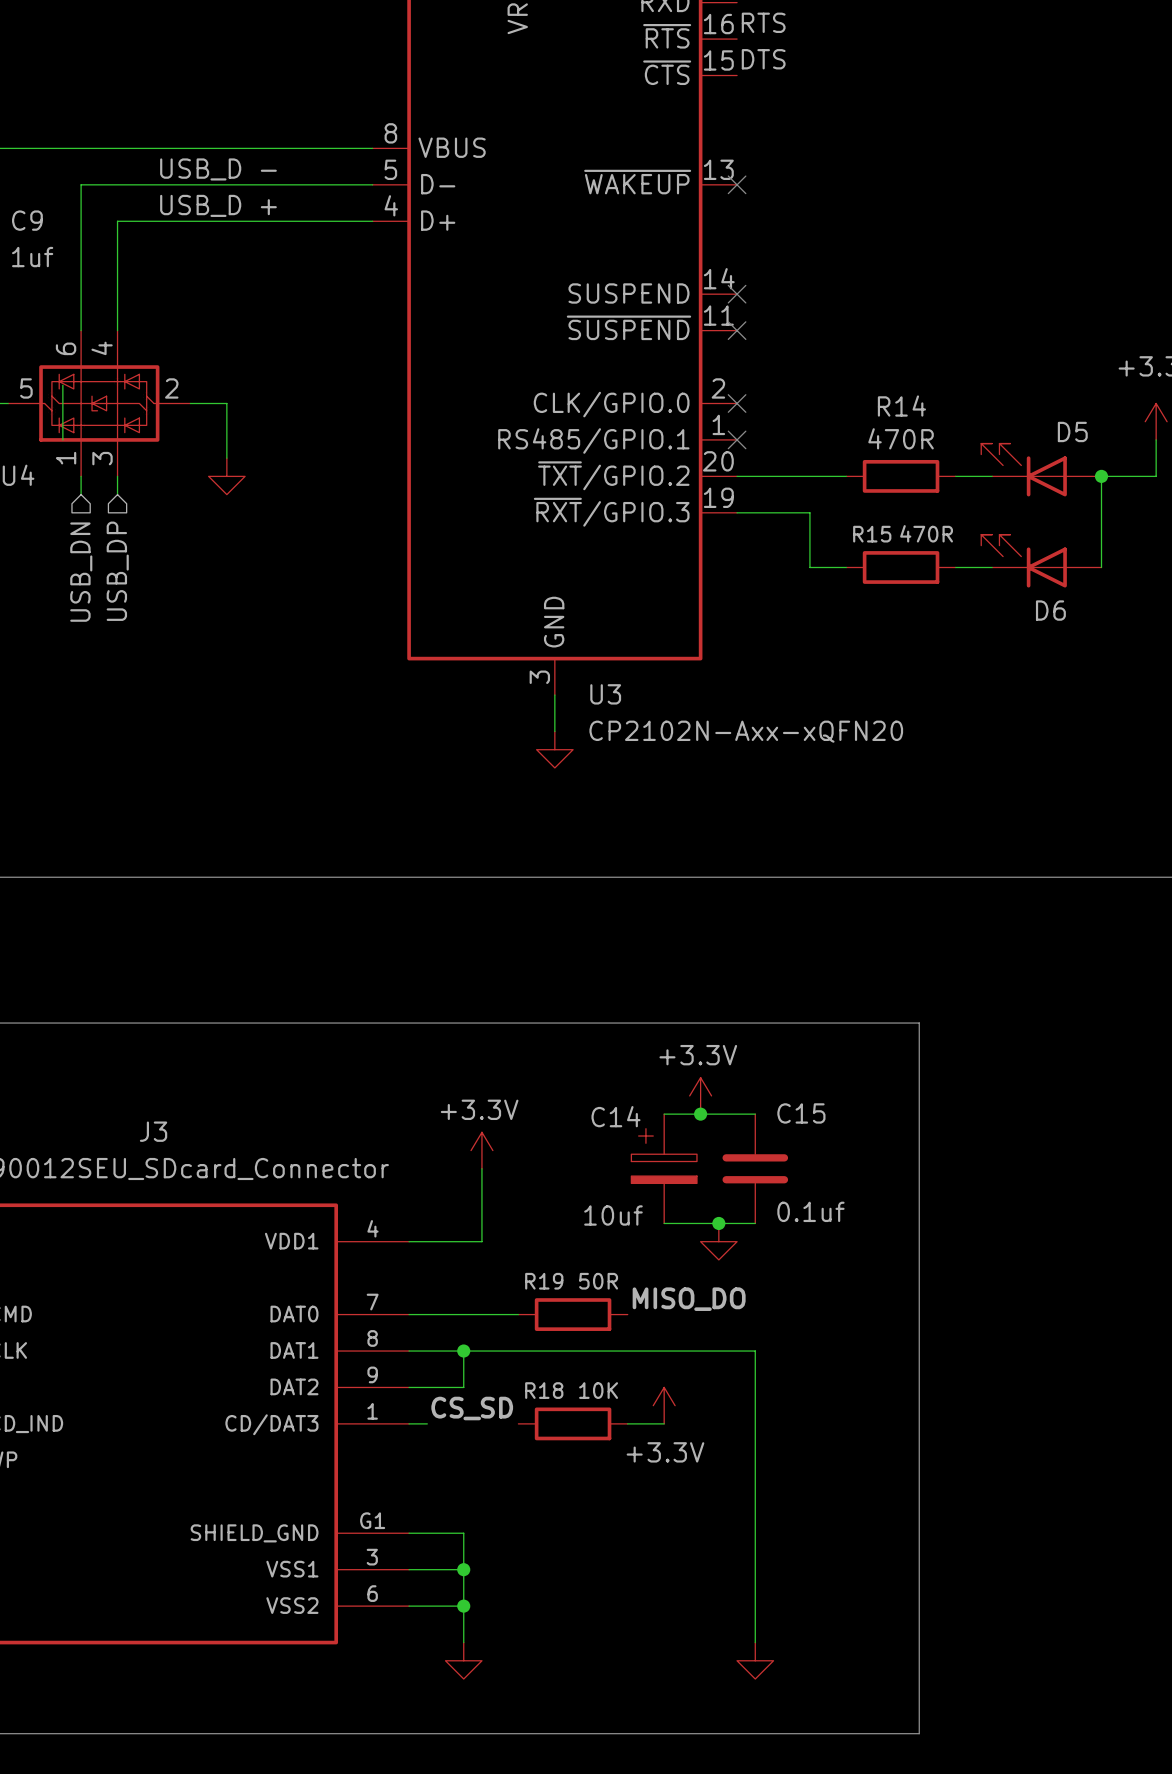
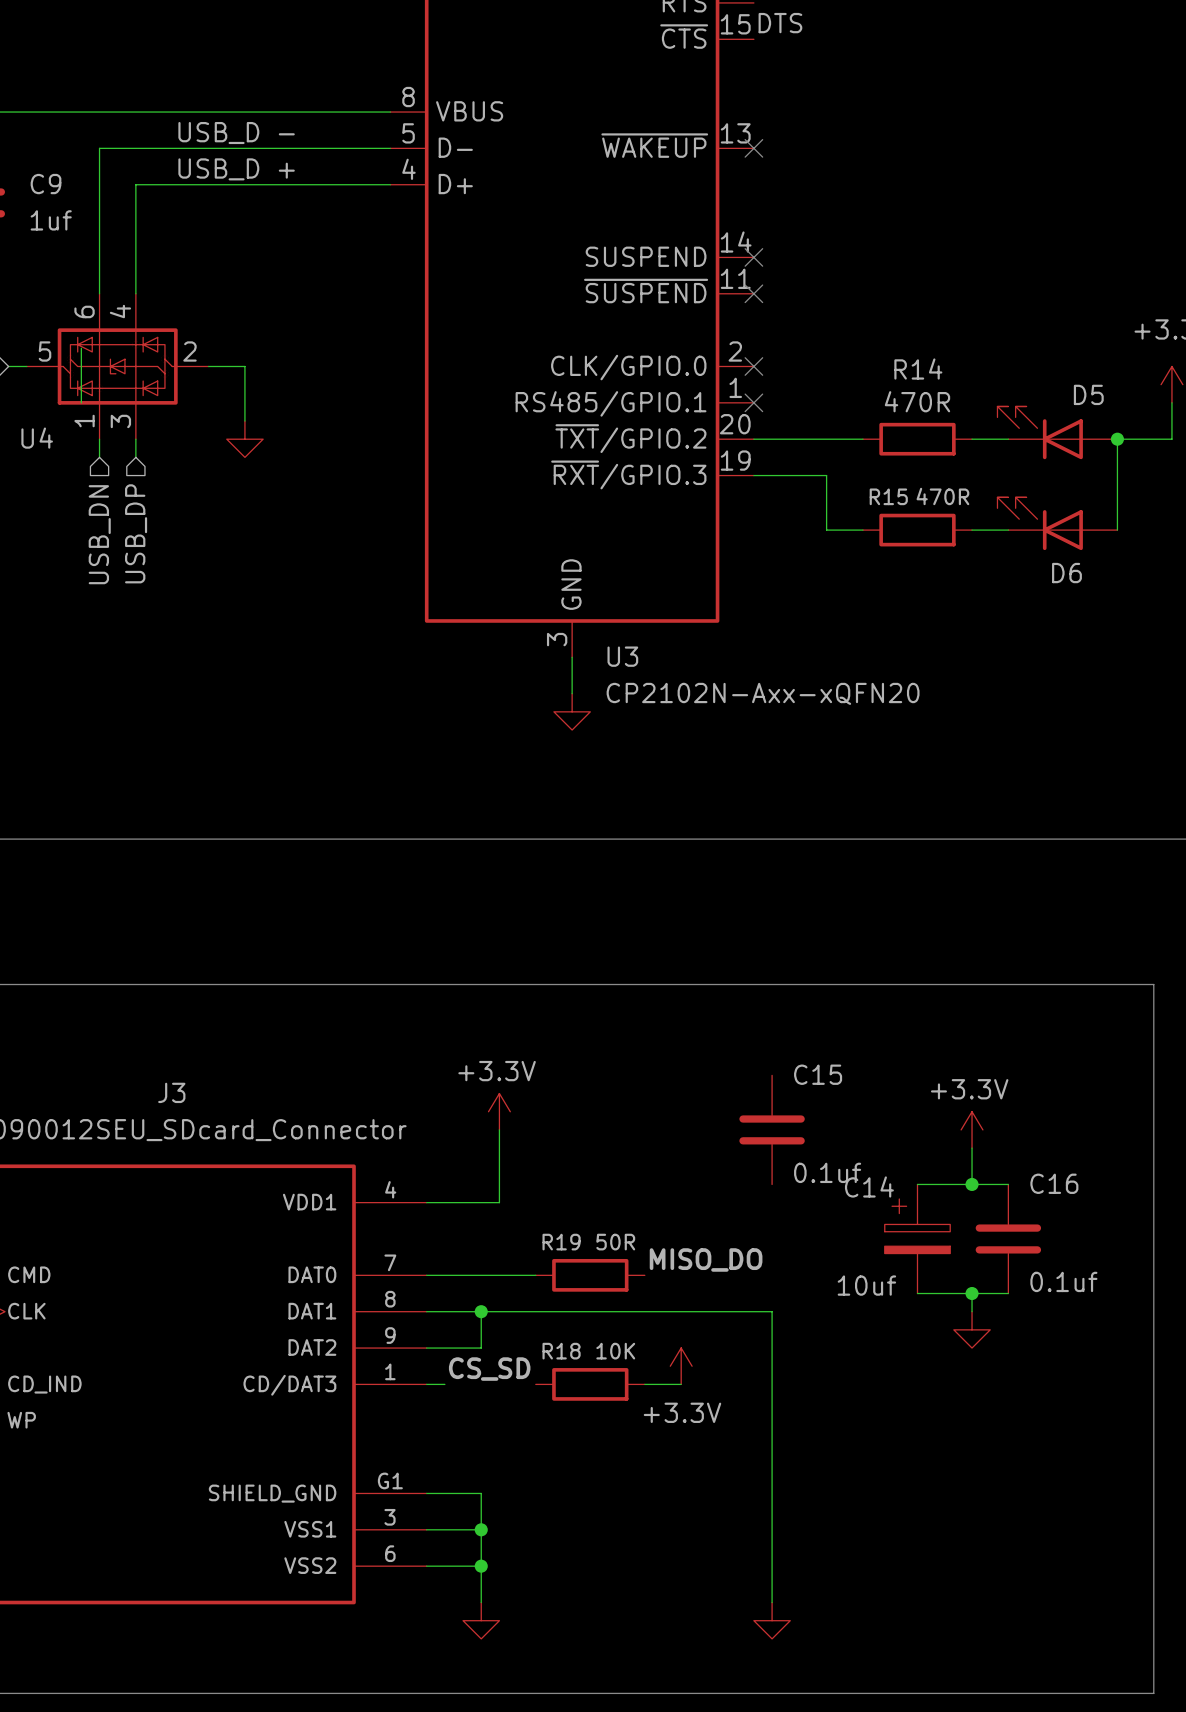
line: (919, 1023) (919, 1733) -> (935, 984) (1153, 984) (1153, 1693) (935, 1693)
power symbol position: +3.3V (700, 1095) -> +3.3V (972, 1129)
wire: (664, 1114) (755, 1114) -> (917, 1184) (1008, 1184)
junction: (700, 1114) -> none
C14 position: (664, 1168) -> (917, 1238)
wire: none -> (972, 1148) (972, 1184)
wire: (664, 1223) (755, 1223) -> (917, 1293) (1008, 1293)
junction: (718, 1223) -> none
junction: none -> (972, 1184)
power symbol position: (718, 1241) -> (972, 1329)
C16: none -> 0.1uf (1008, 1238)
wire: none -> (972, 1293) (972, 1311)
junction: none -> (972, 1293)

